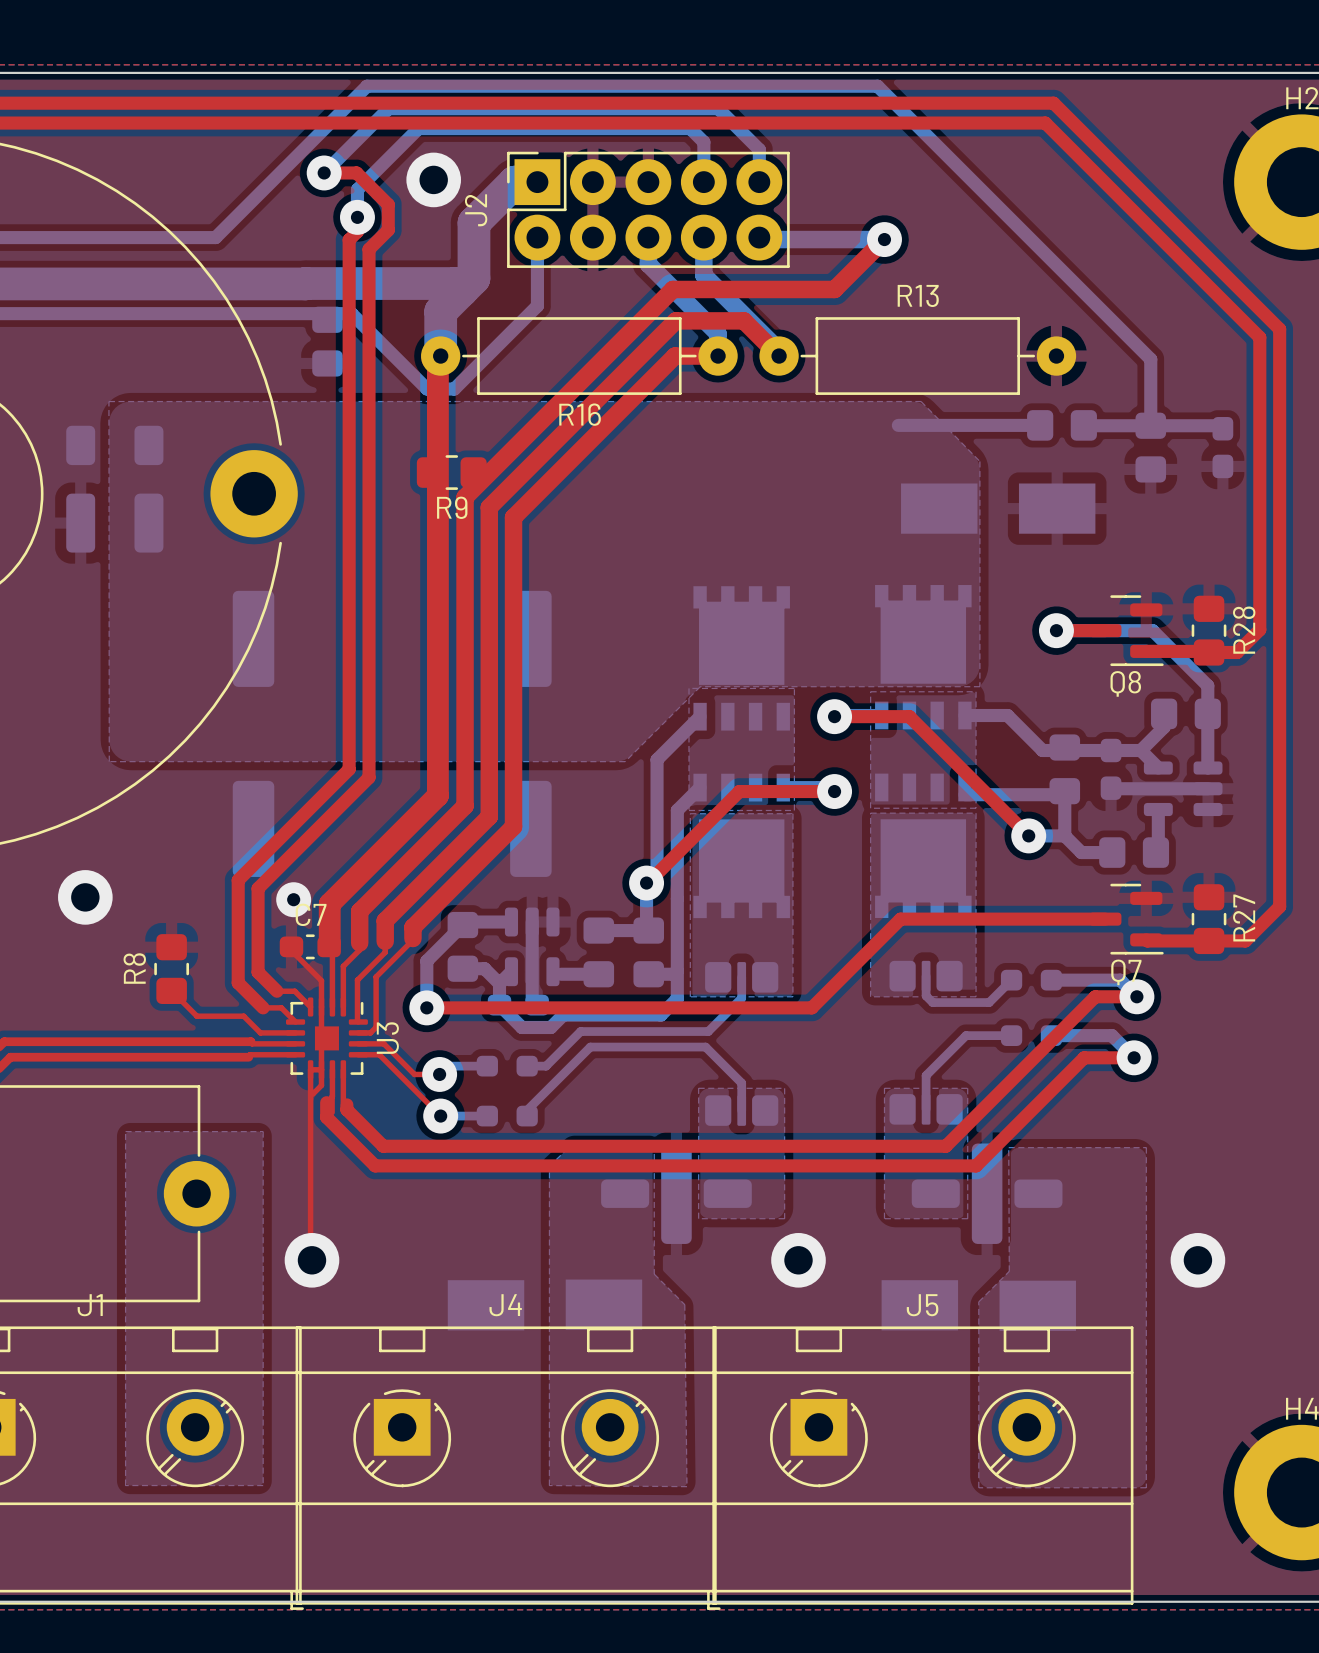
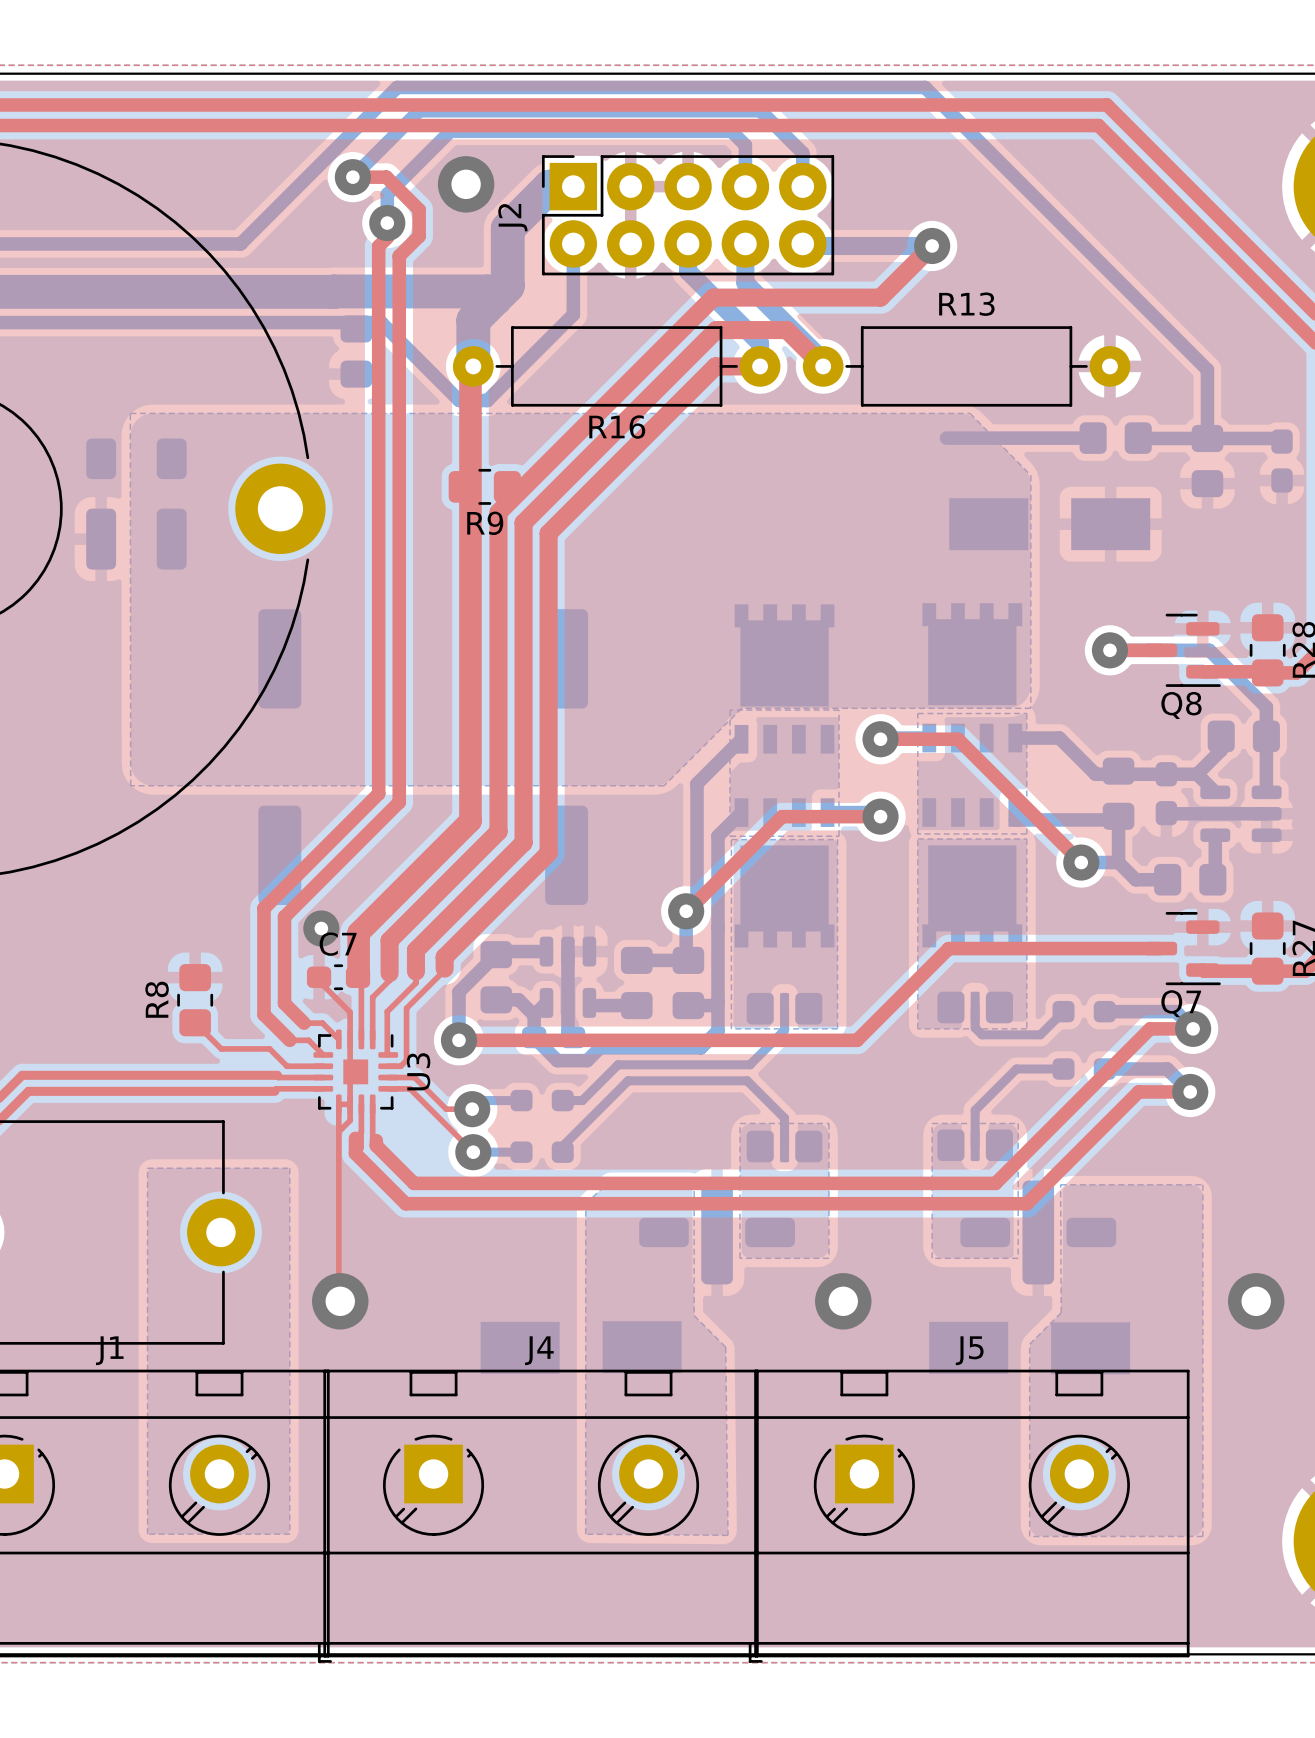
via: (85, 897) -> none

